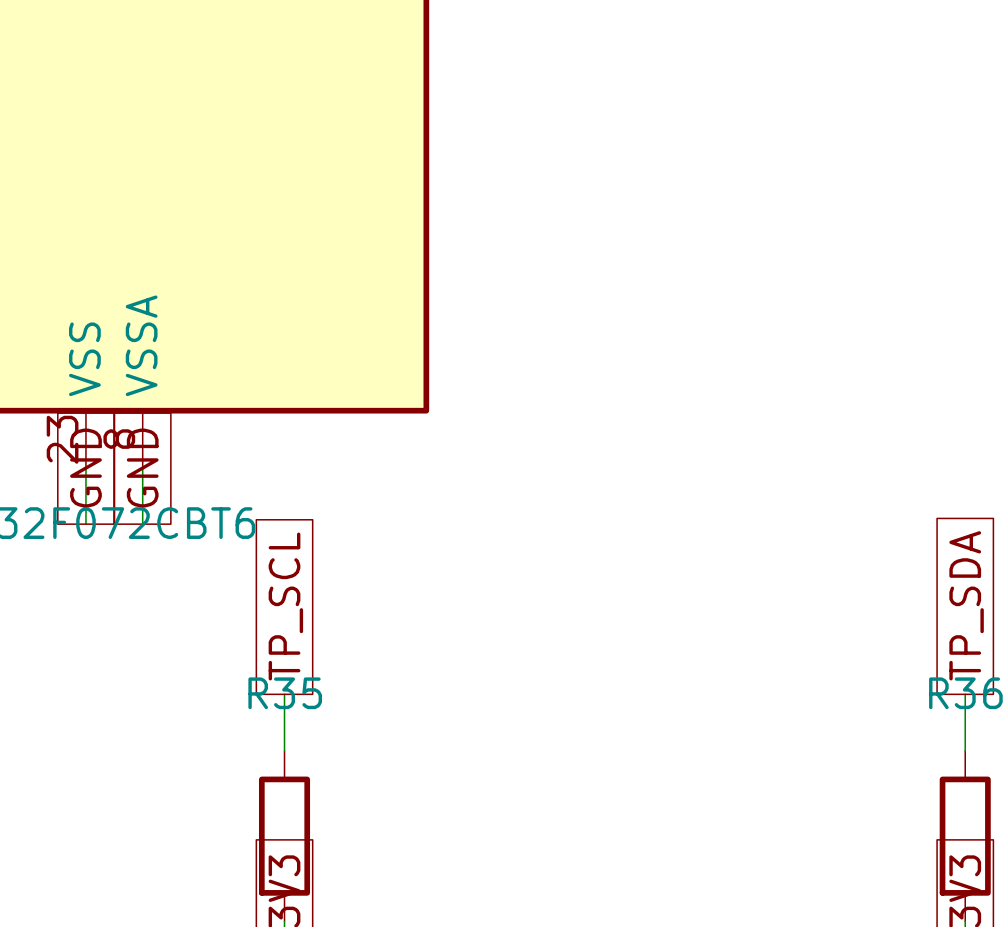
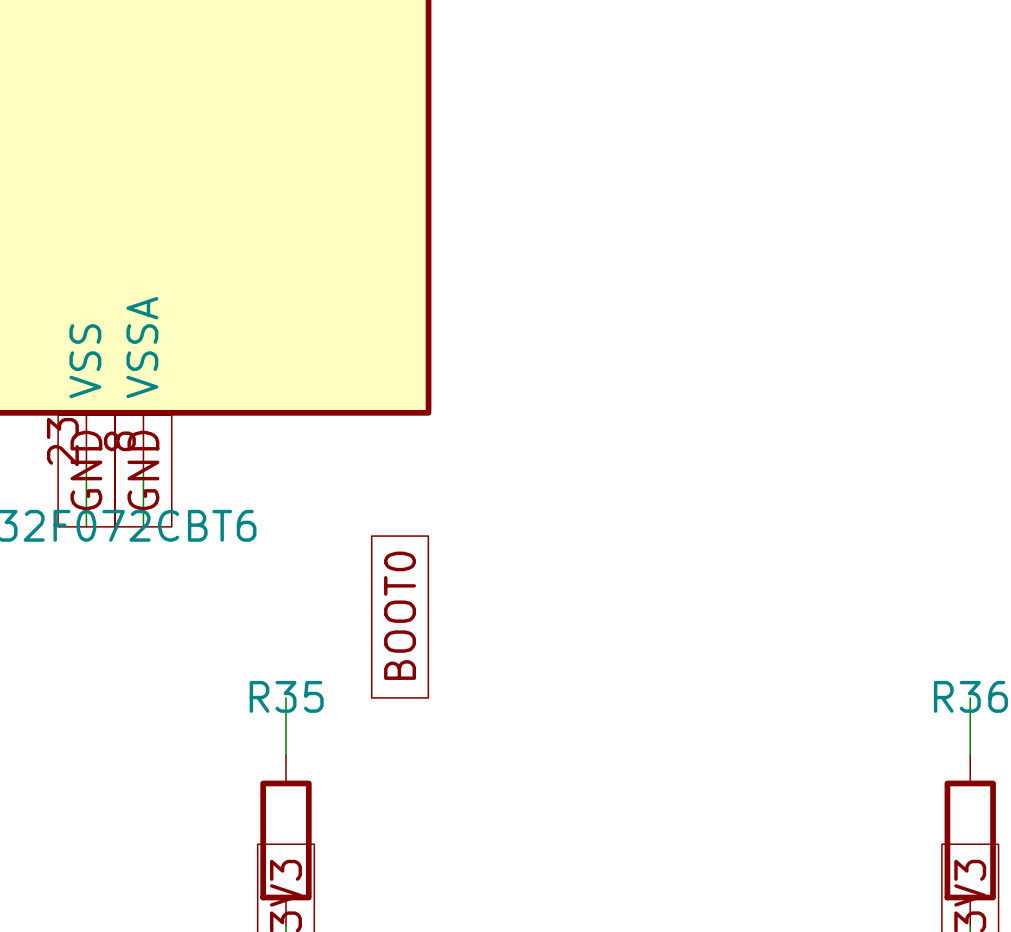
global label: TP_SDA (966, 605) -> none
global label: TP_SCL (285, 606) -> none
global label: none -> BOOT0 (400, 615)

